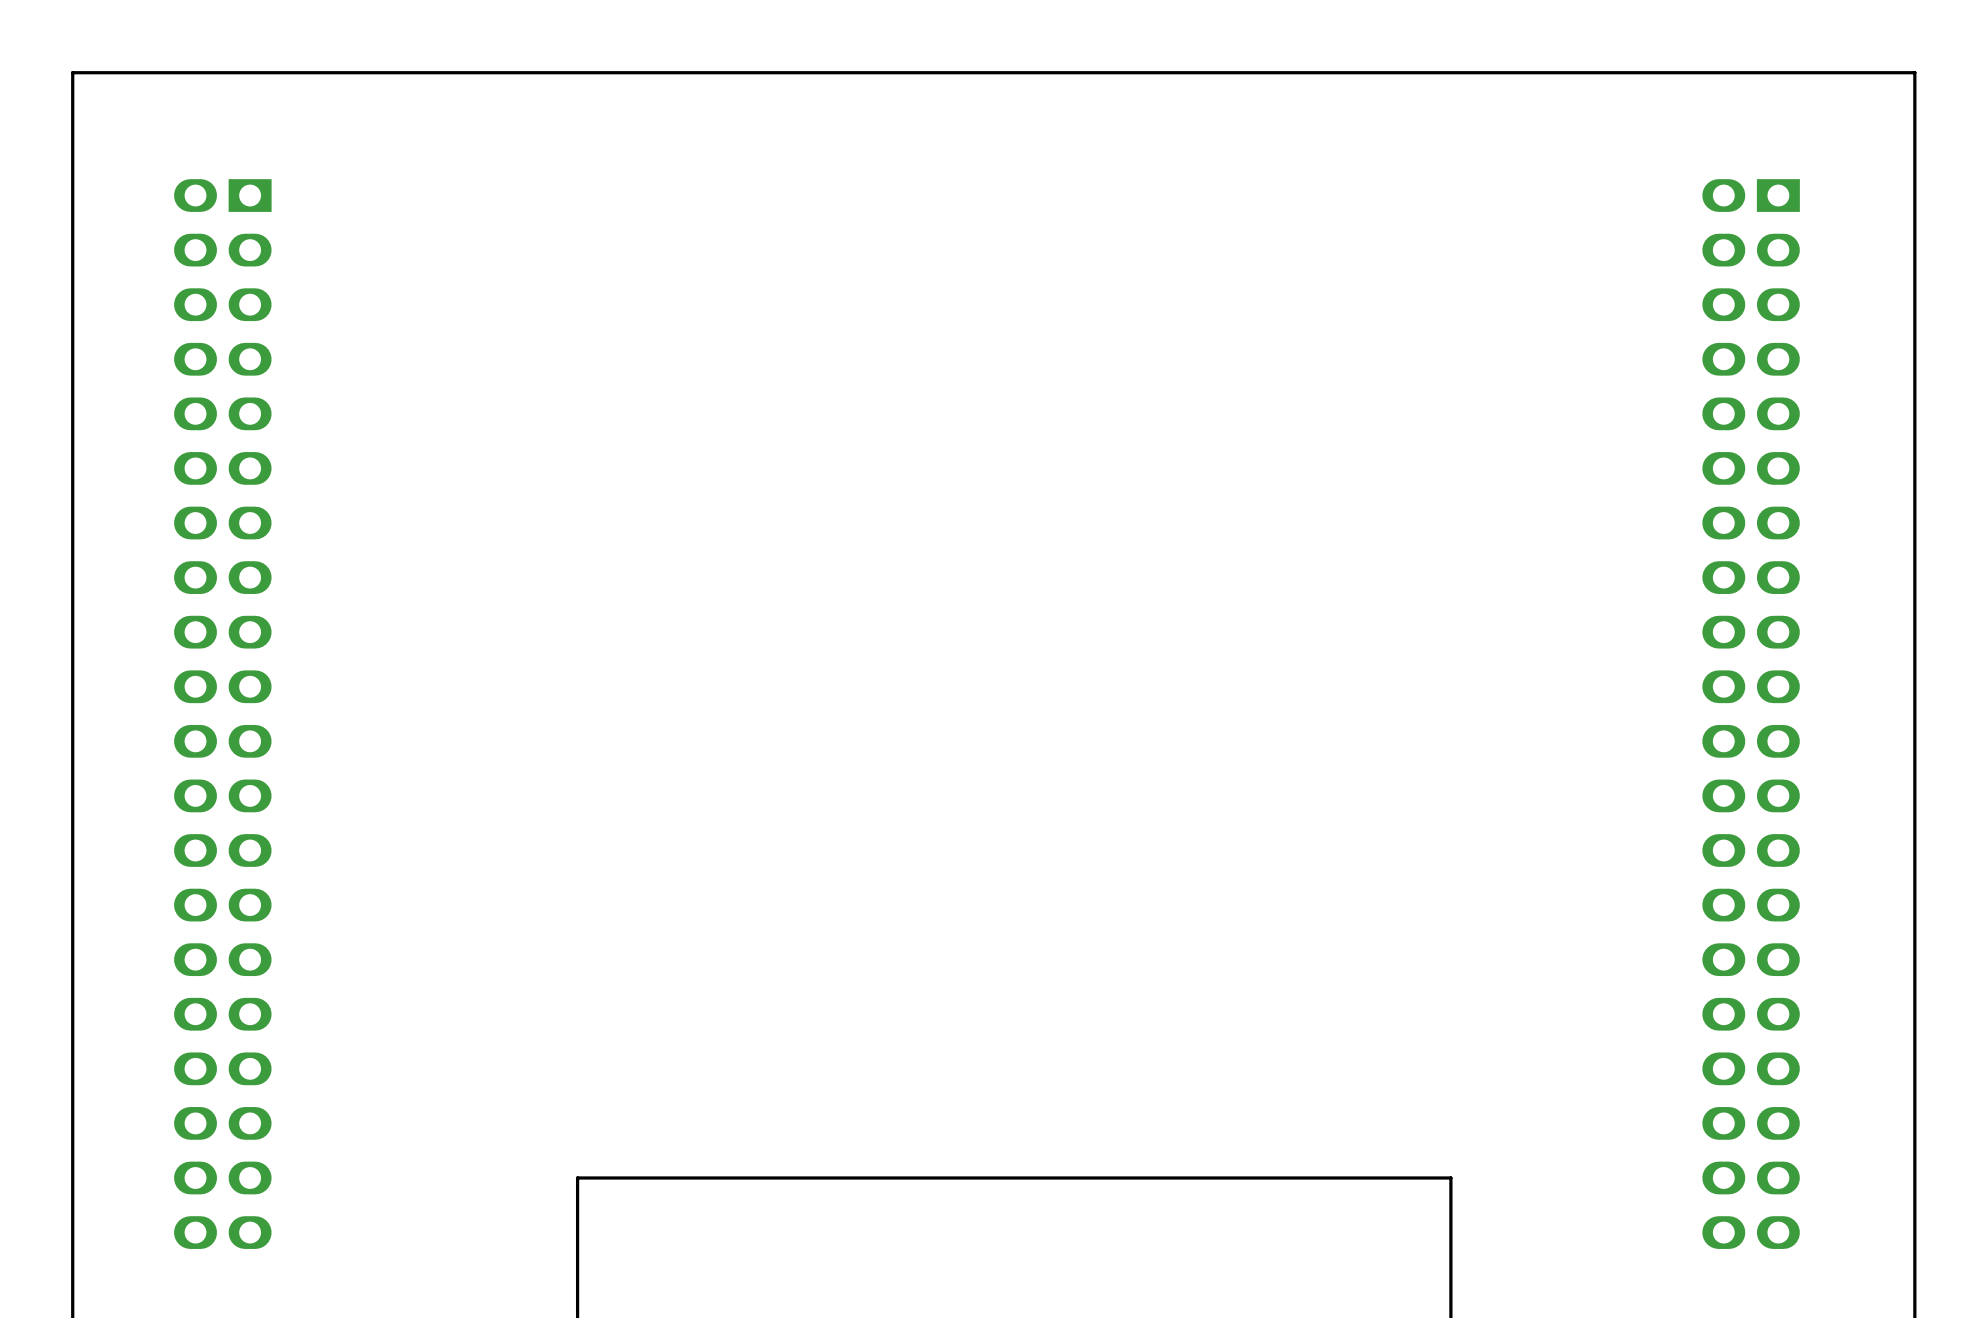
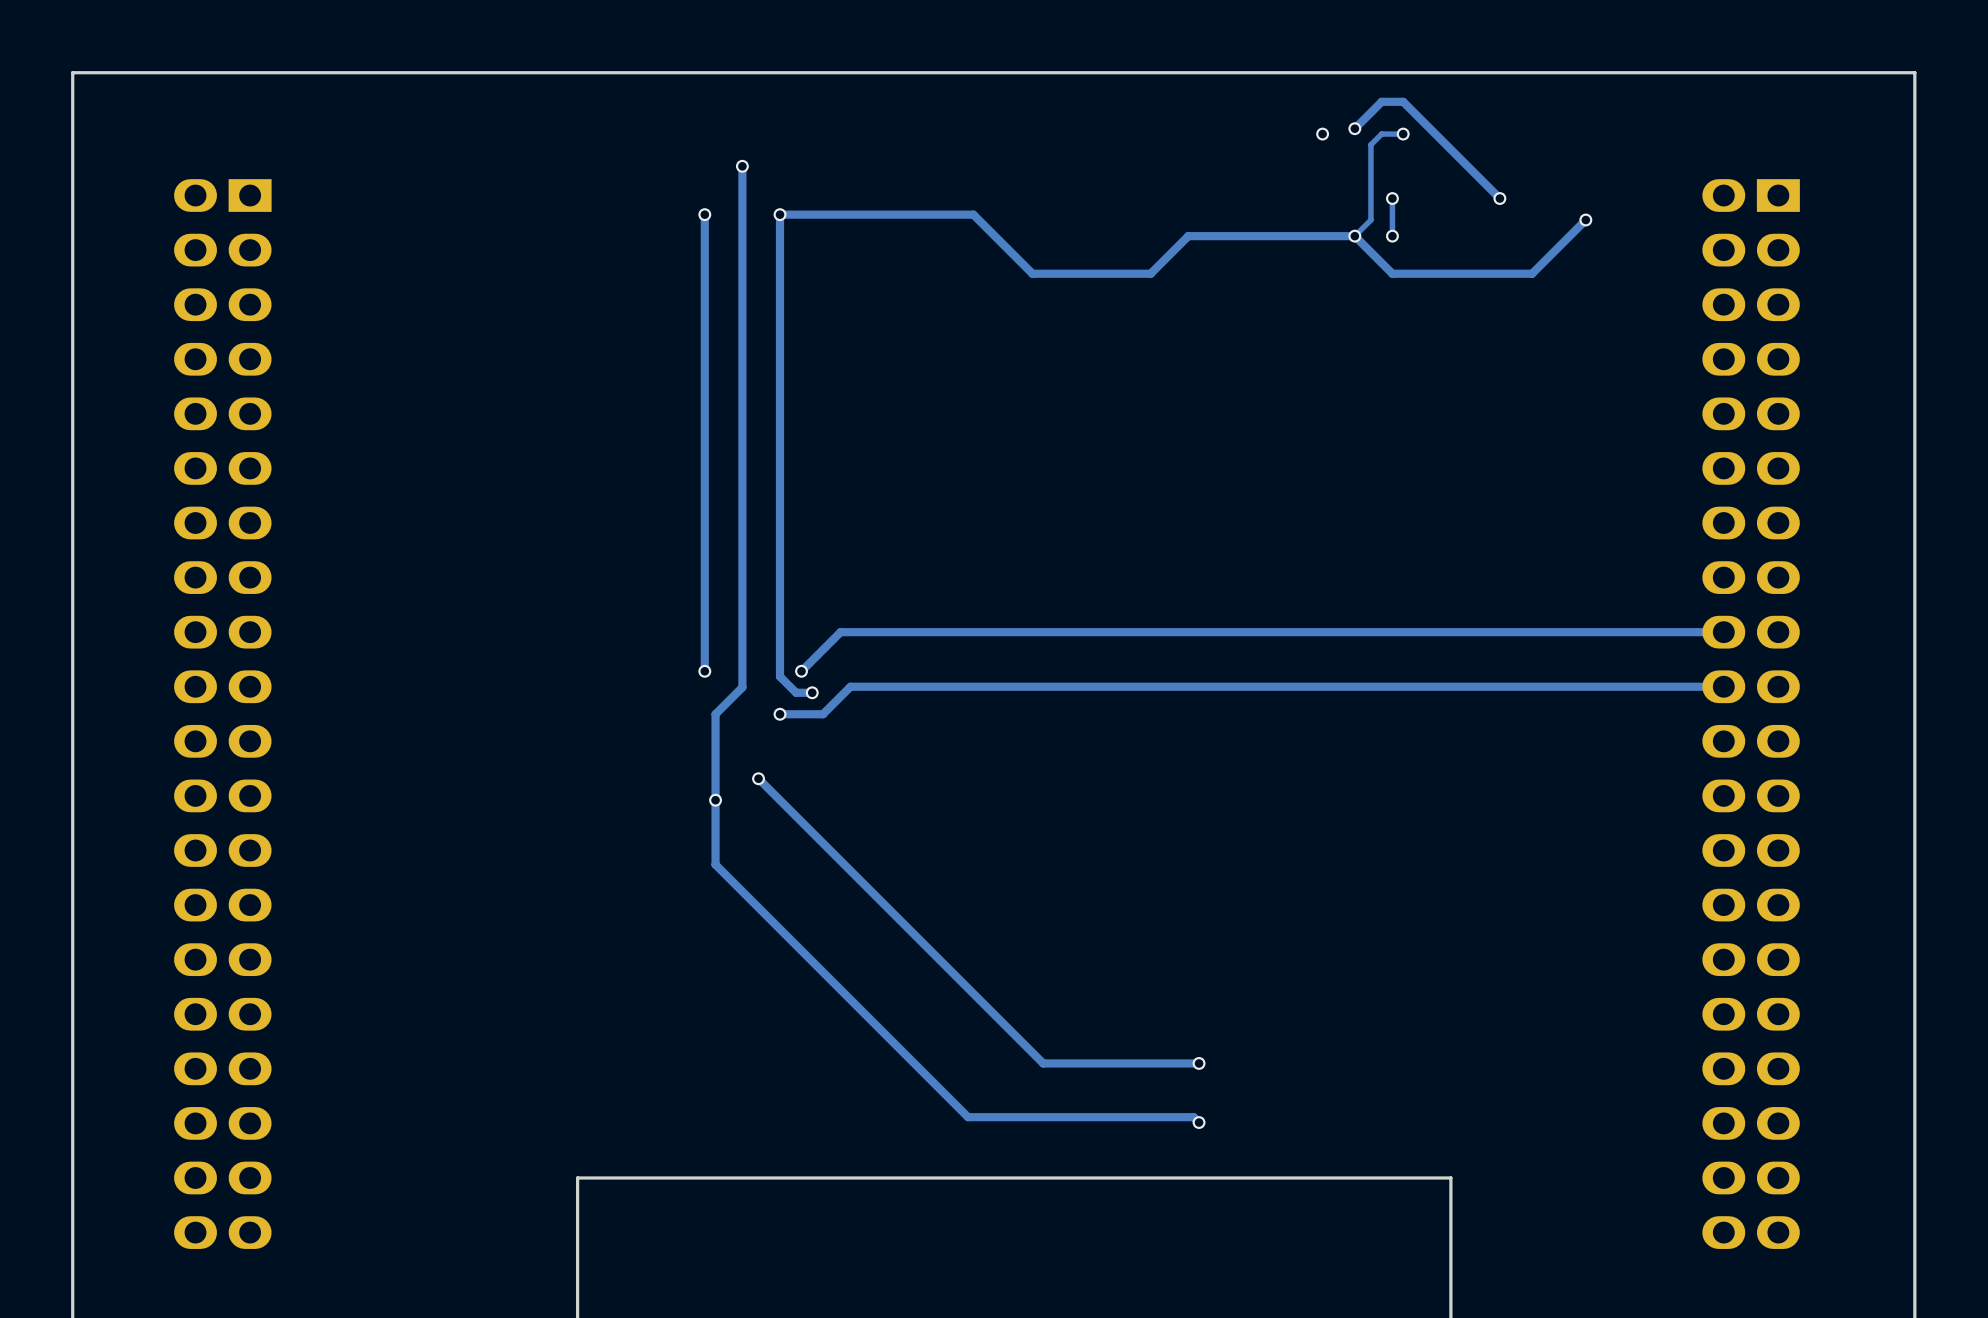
track: none -> (1354, 128) (1381, 101) (1403, 101) (1499, 198)
via: none -> (1354, 128)
via: none -> (1322, 134)
track: none -> (1403, 134) (1381, 134) (1370, 144) (1370, 220) (1354, 236)
via: none -> (1403, 134)
track: none -> (742, 166) (742, 687) (715, 714) (715, 864) (968, 1117) (1193, 1117) (1199, 1122)
via: none -> (742, 166)
track: none -> (1392, 198) (1392, 236)
via: none -> (1392, 198)
via: none -> (1499, 198)
track: none -> (704, 214) (704, 671)
via: none -> (704, 214)
via: none -> (780, 214)
track: none -> (1585, 220) (1532, 273) (1392, 273) (1354, 236)
via: none -> (1585, 220)
track: none -> (1354, 236) (1188, 236) (1150, 273) (1032, 273) (973, 214) (780, 214) (780, 676) (796, 692) (812, 692)
via: none -> (1354, 236)
via: none -> (1392, 236)
track: none -> (1723, 632) (840, 632) (801, 671)
via: none -> (704, 671)
via: none -> (801, 671)
track: none -> (1723, 686) (850, 686) (822, 714) (780, 714)
via: none -> (812, 692)
via: none -> (780, 714)
track: none -> (758, 778) (1043, 1063) (1199, 1063)
via: none -> (758, 778)
via: none -> (715, 800)
via: none -> (1199, 1063)
via: none -> (1199, 1122)

